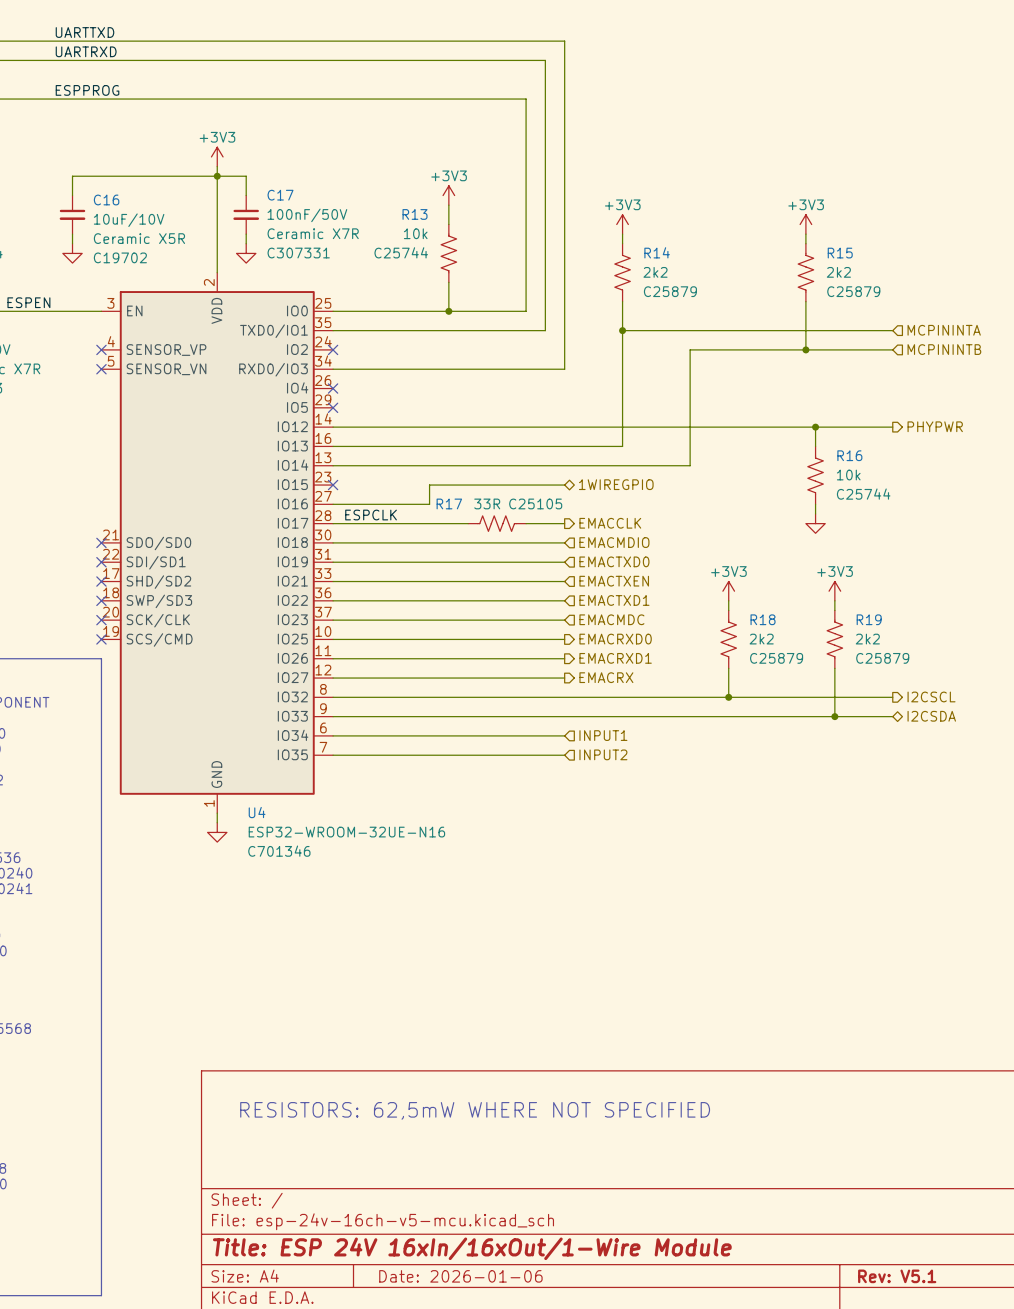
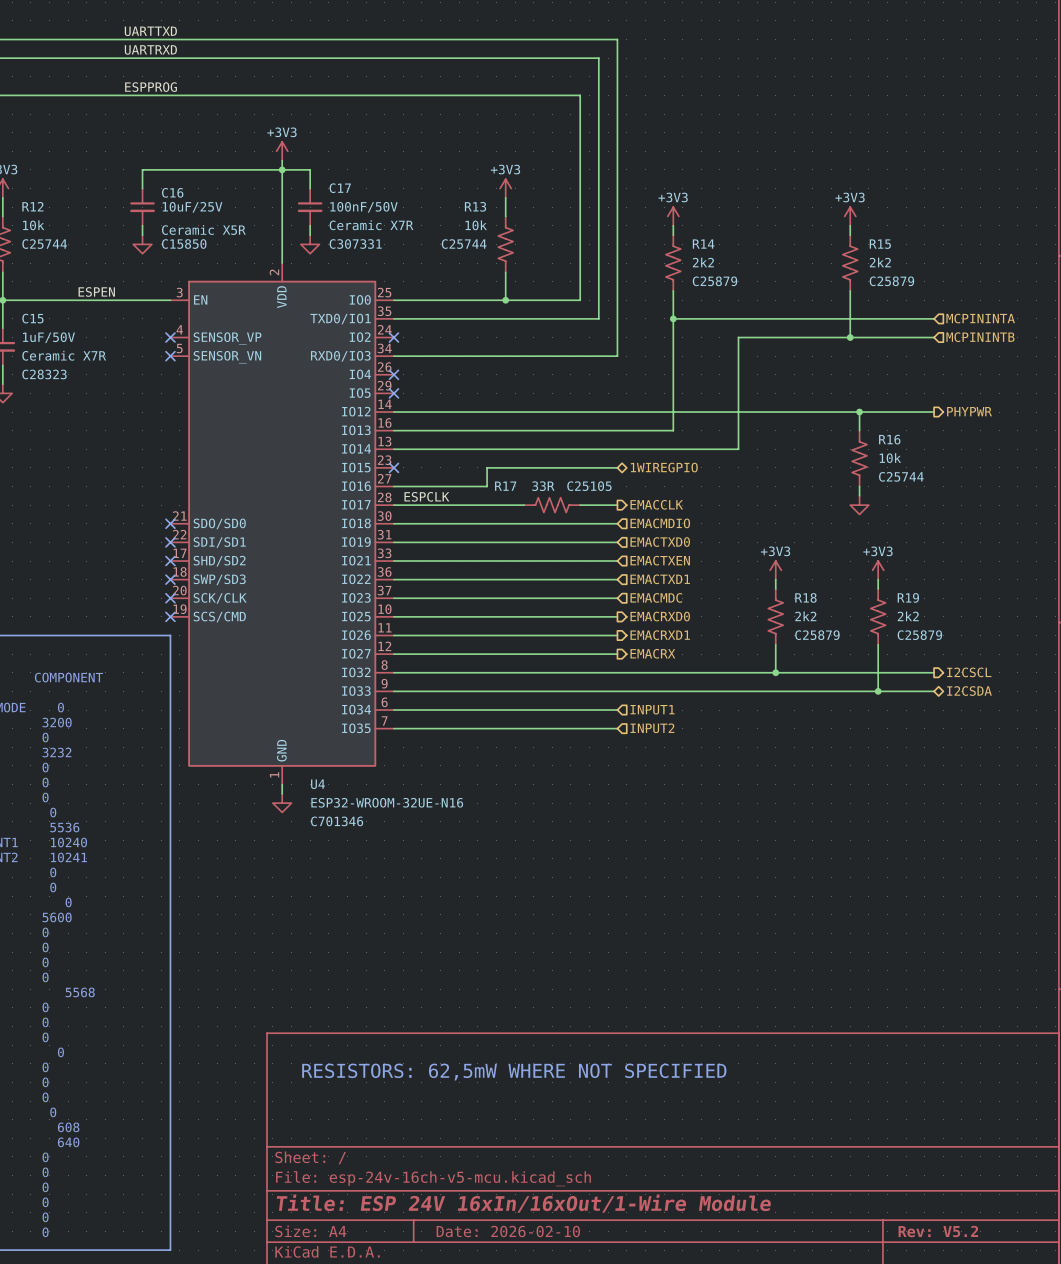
C16 value: 10uF/10V (129, 220) -> 10uF/25V (192, 207)
C16 text: C19702 (120, 257) -> C15850 (184, 244)
title block: Date: 2026-01-06 (460, 1276) -> Date: 2026-02-10 (508, 1231)
title block: Rev: V5.1 (897, 1276) -> Rev: V5.2 (938, 1231)

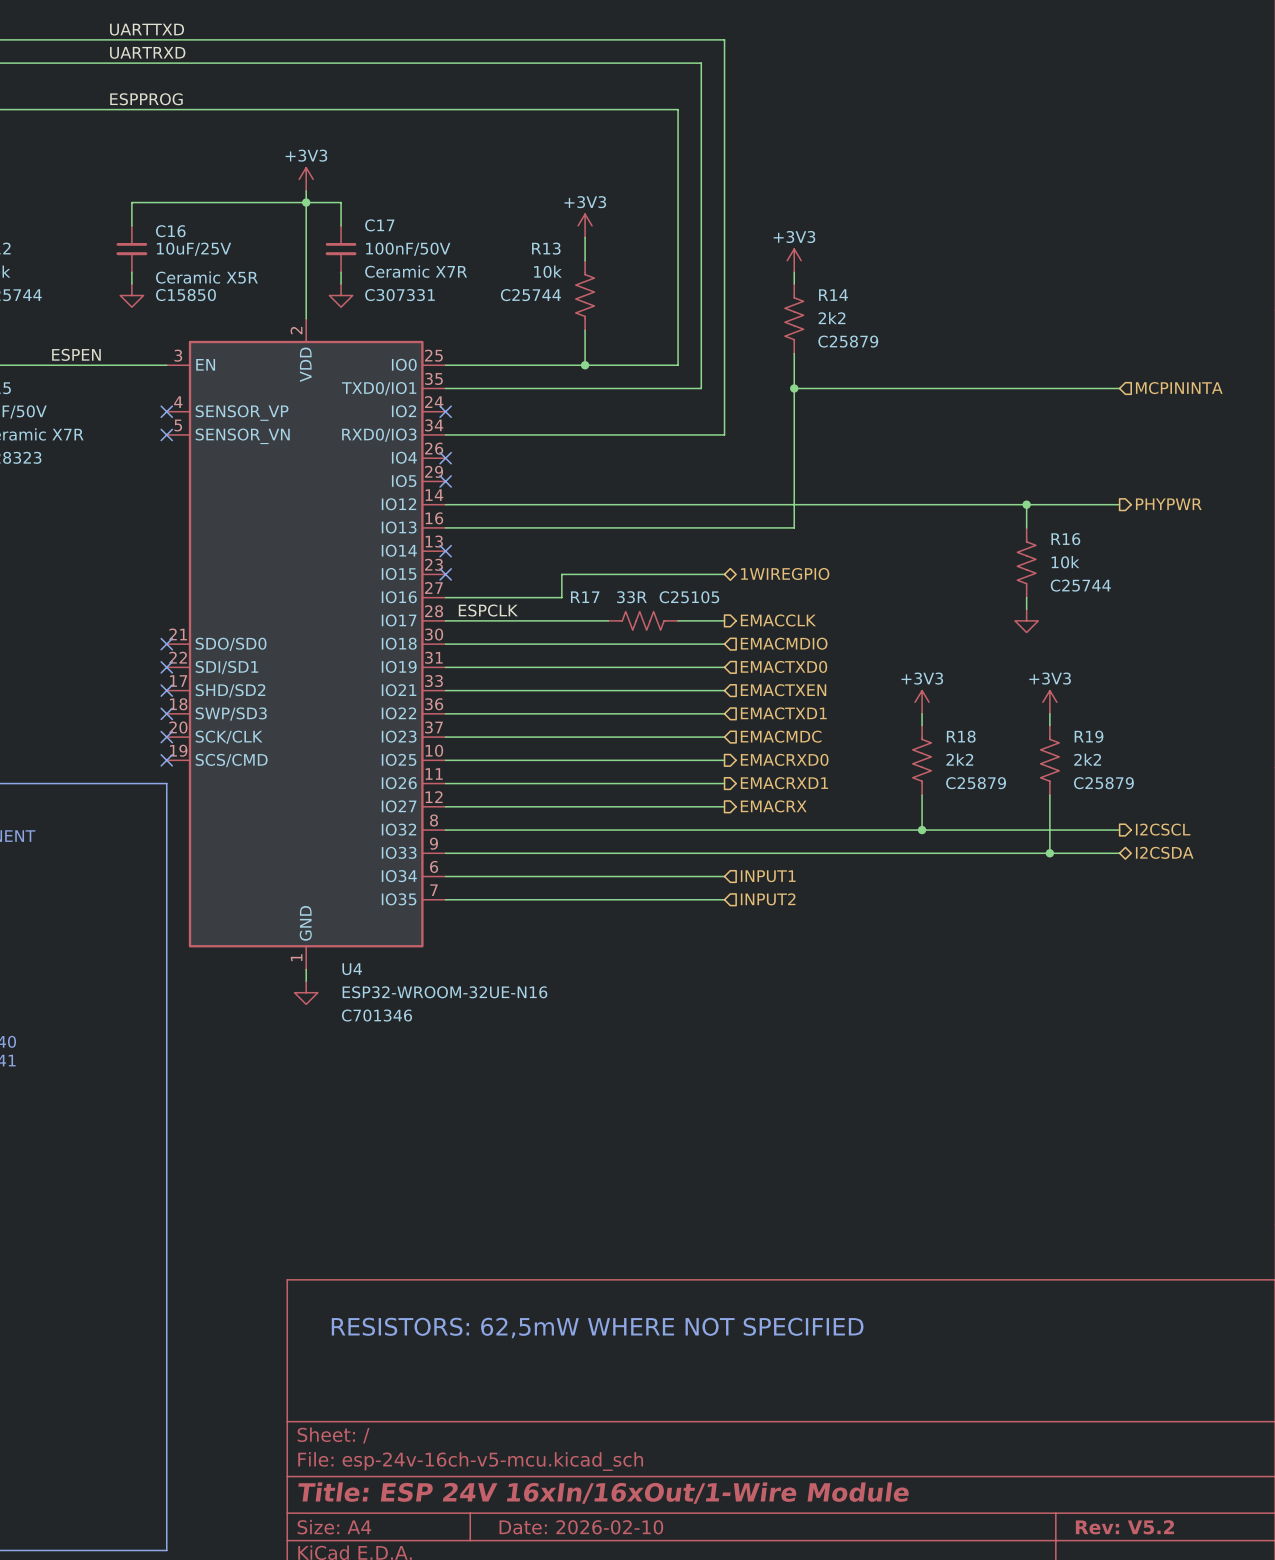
power symbol: +3V3 (850, 216) -> none
wire: (850, 225) (850, 235) -> none
R15: 2k2 (850, 263) -> none
wire: (850, 290) (850, 337) -> none
junction: (850, 337) -> none
wire: (934, 337) (738, 337) (738, 449) (393, 449) -> none
hierarchical label: MCPININTB (980, 337) -> none
no-connect mark: none -> (445, 551)

